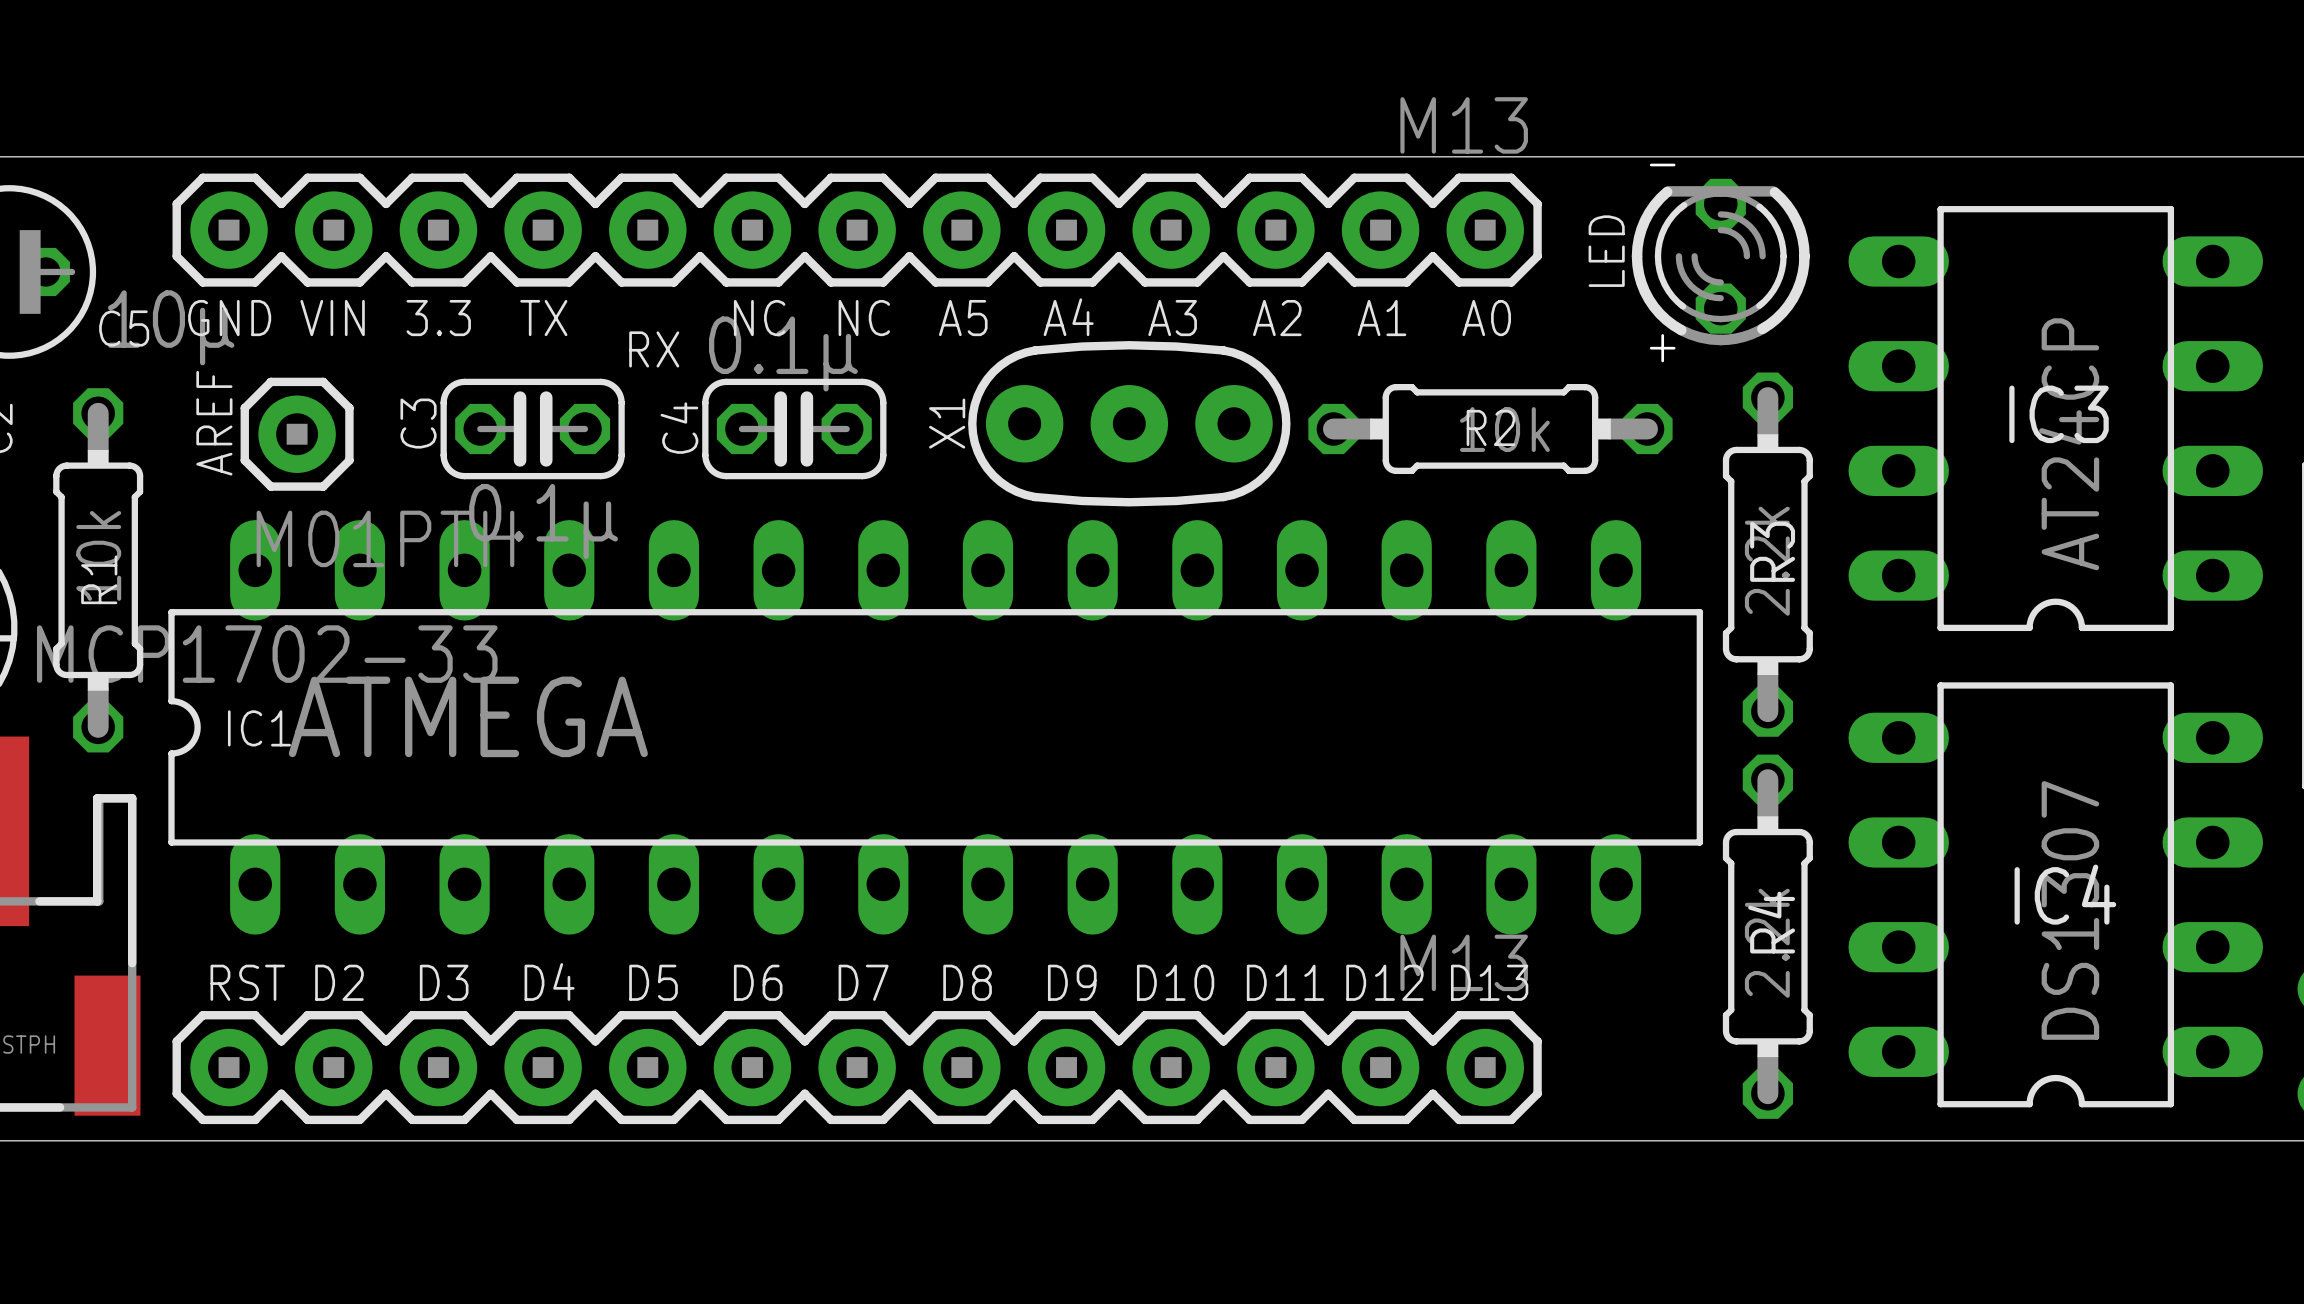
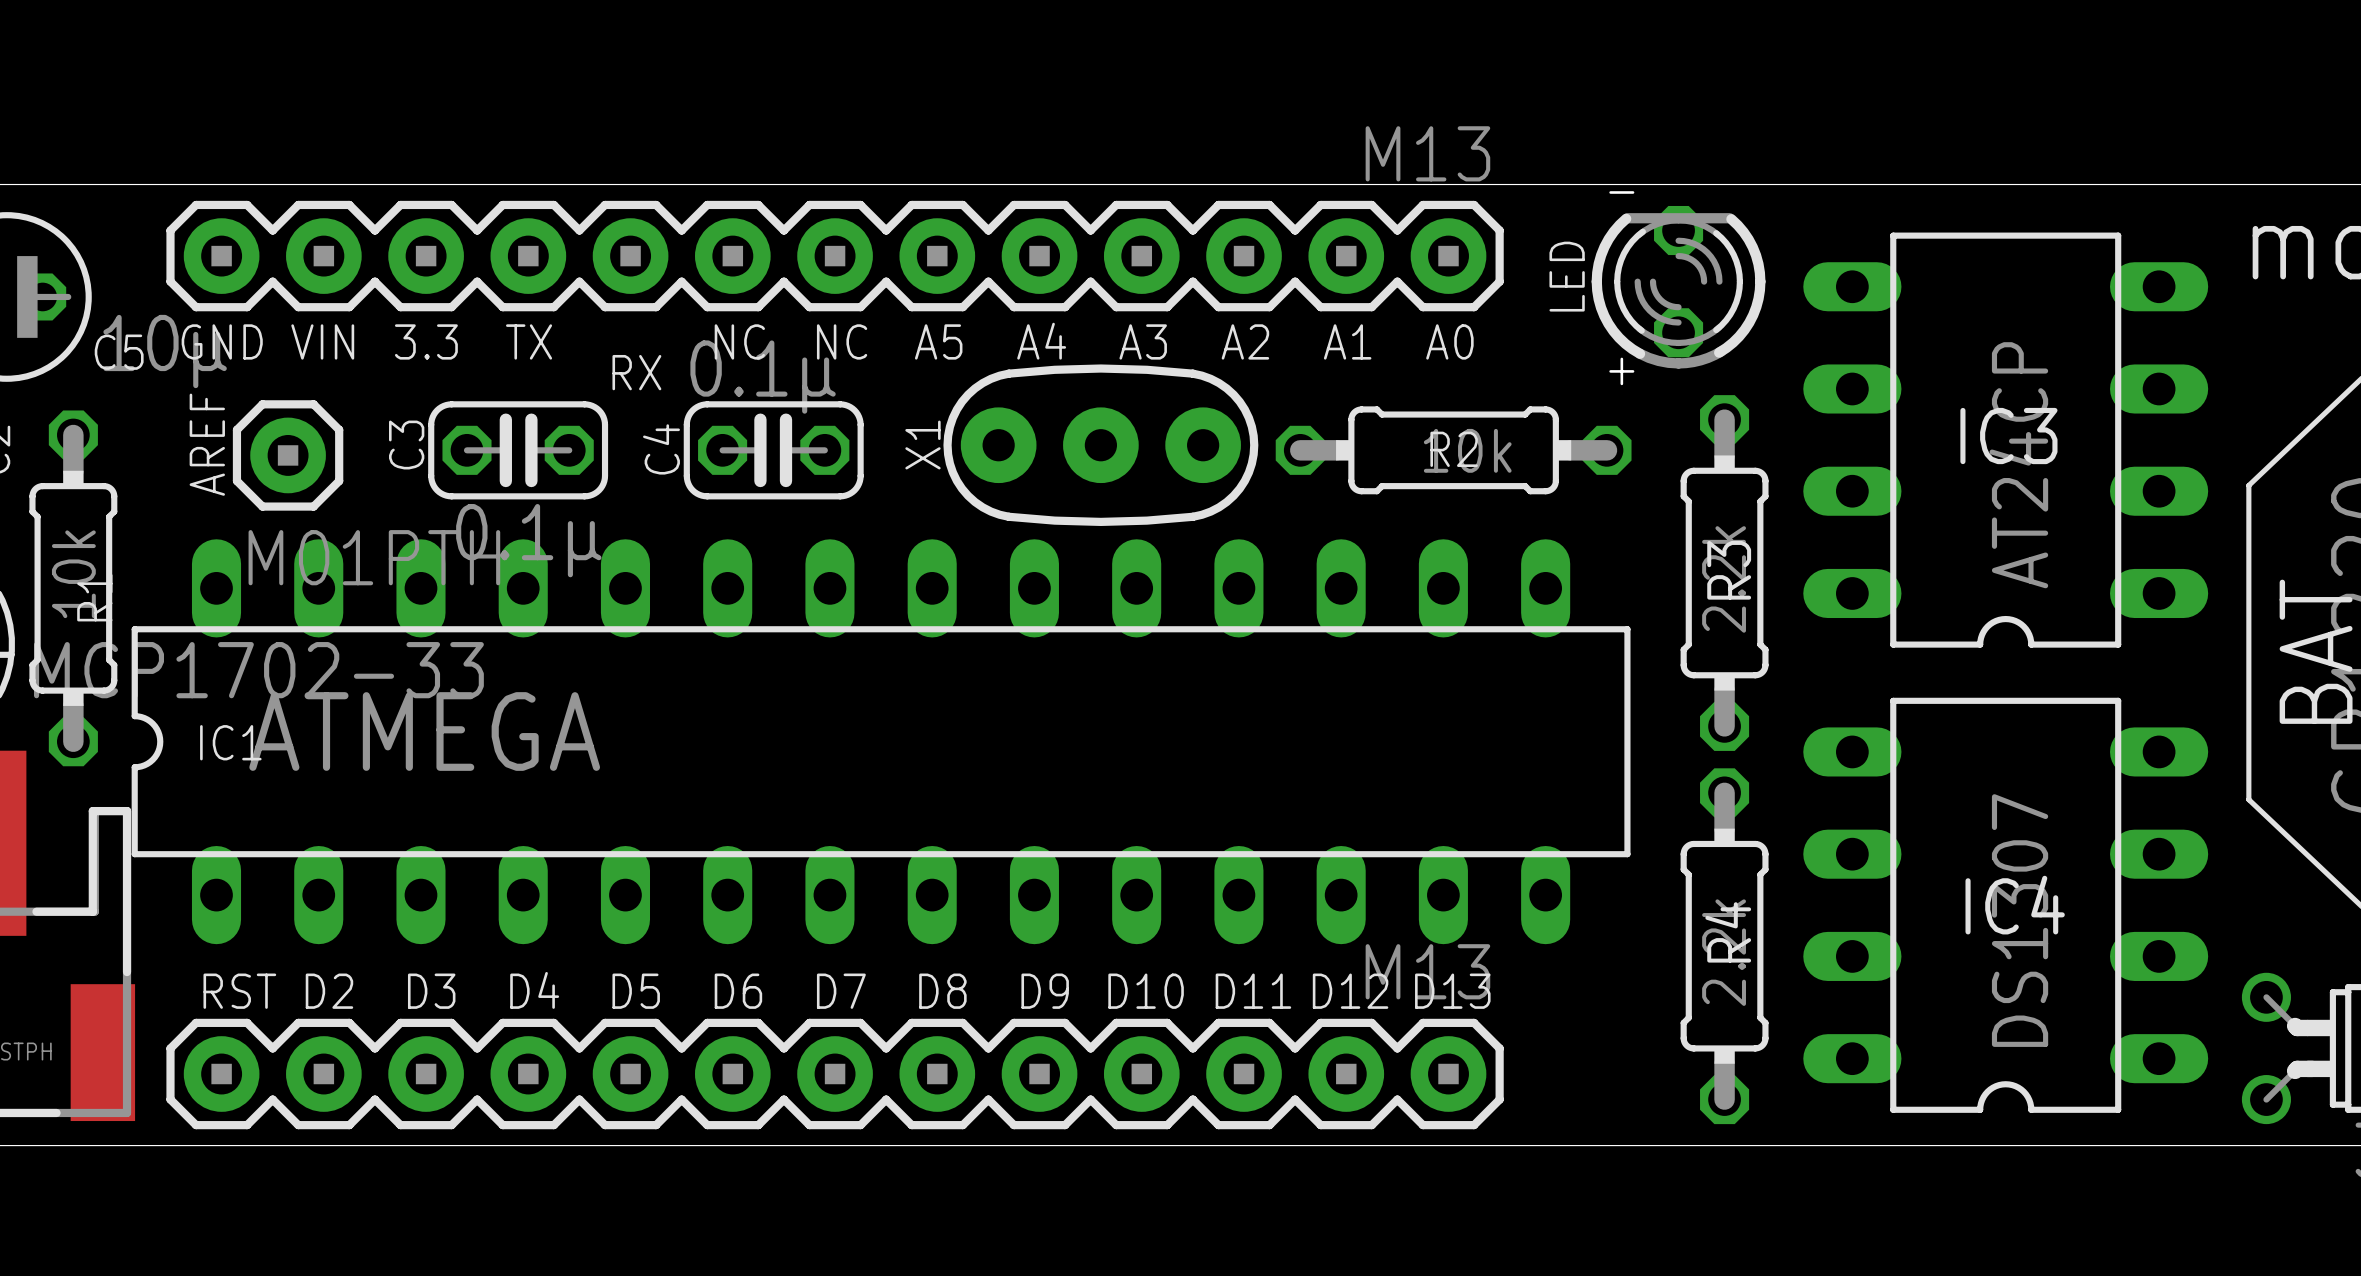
part position: (98, 570) -> (73, 588)
part position: (935, 727) -> (881, 741)
text position: IC1 (259, 728) -> IC1 (230, 742)

